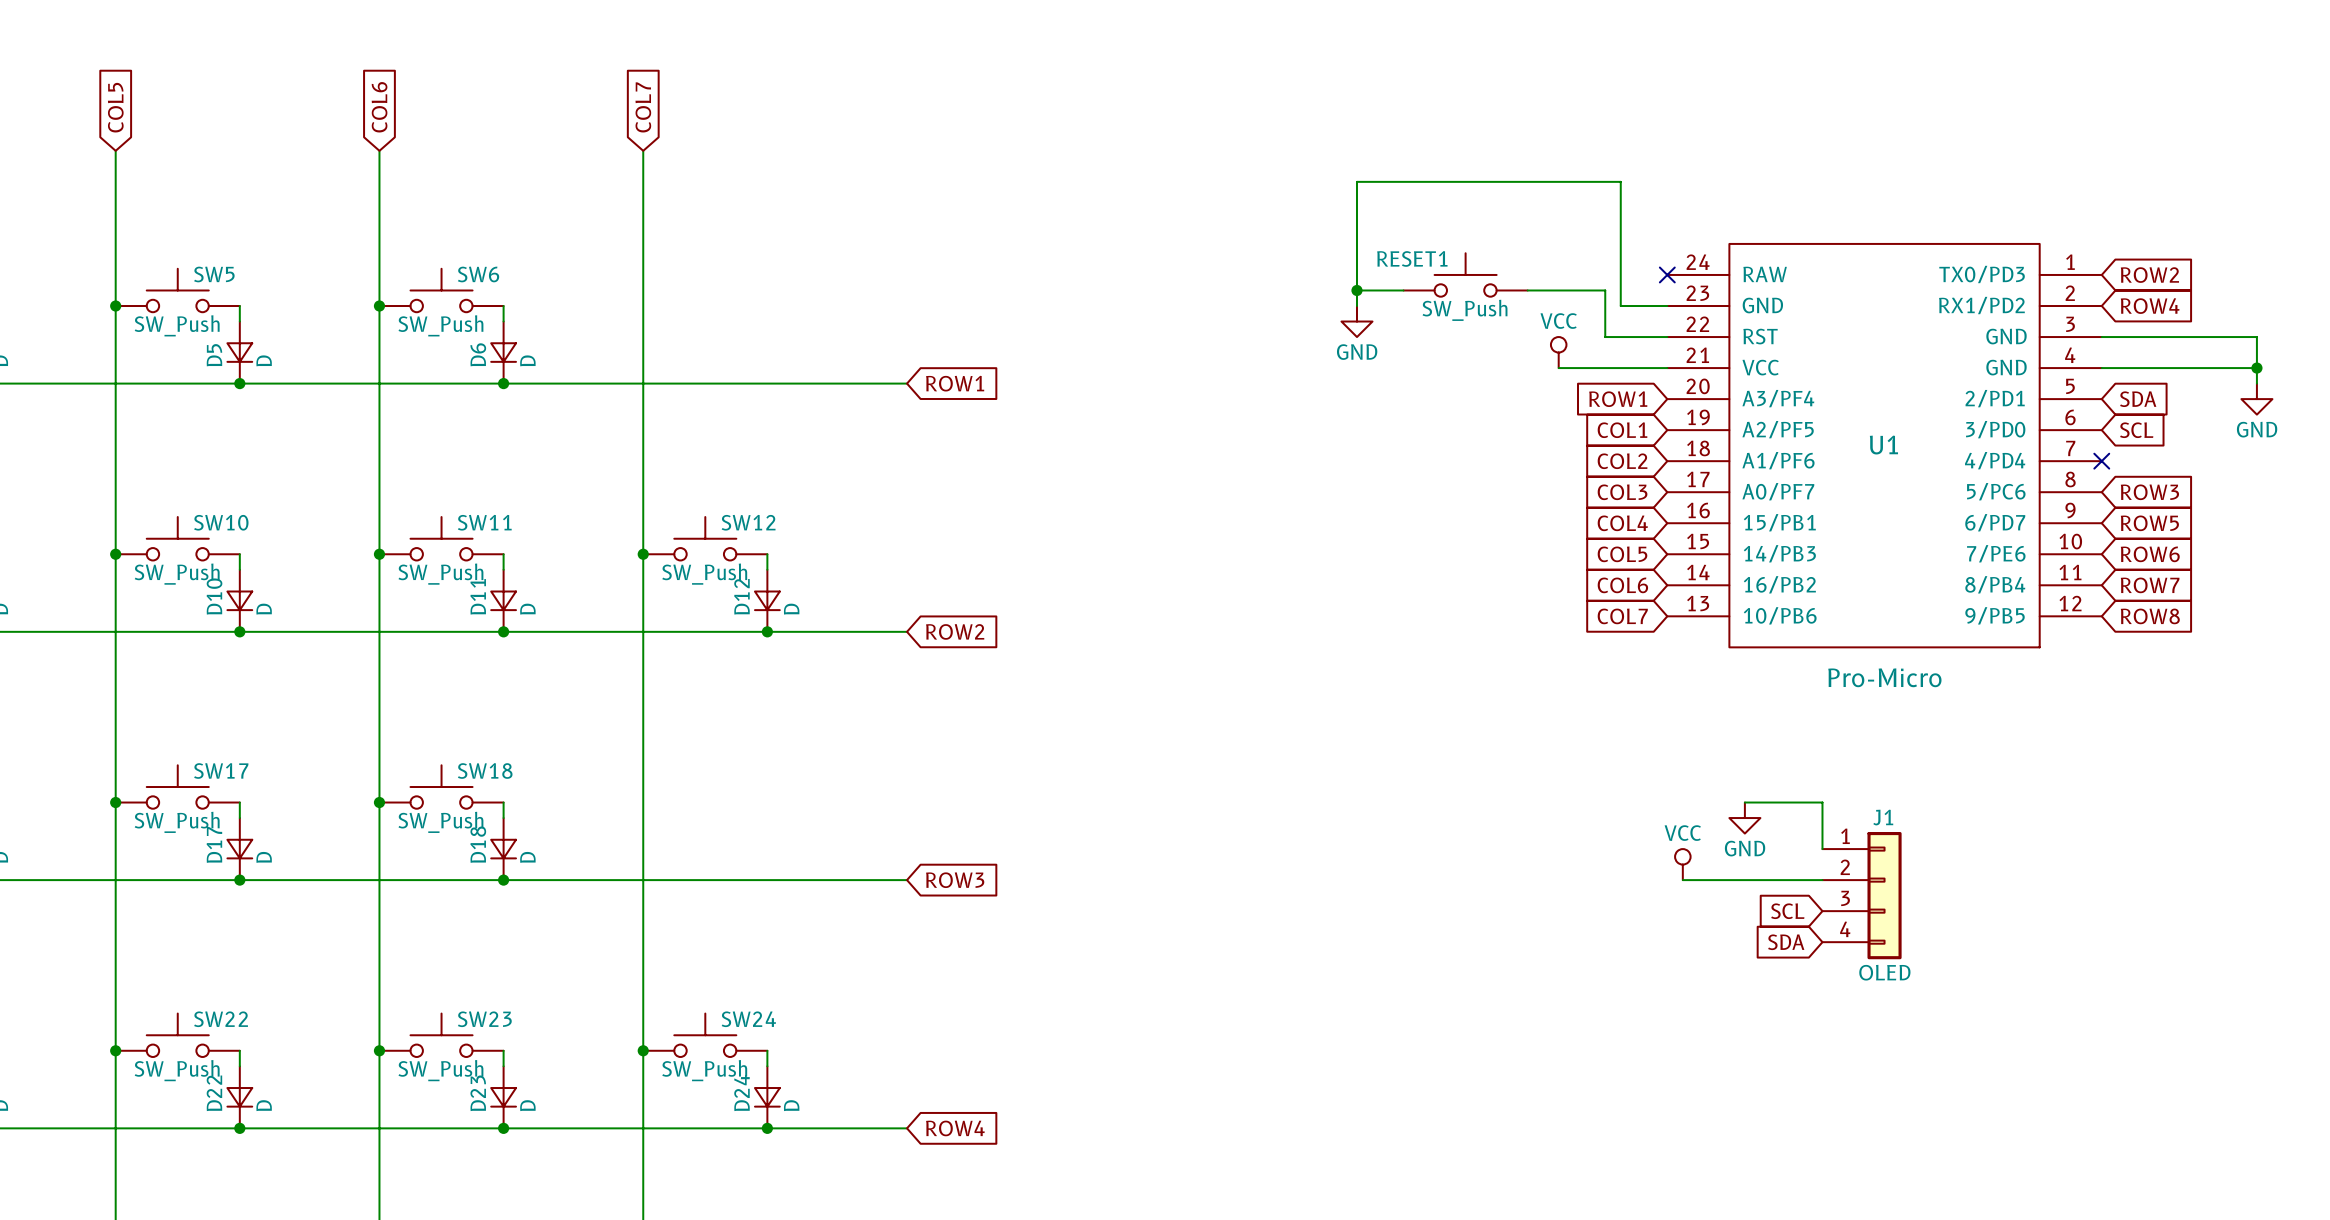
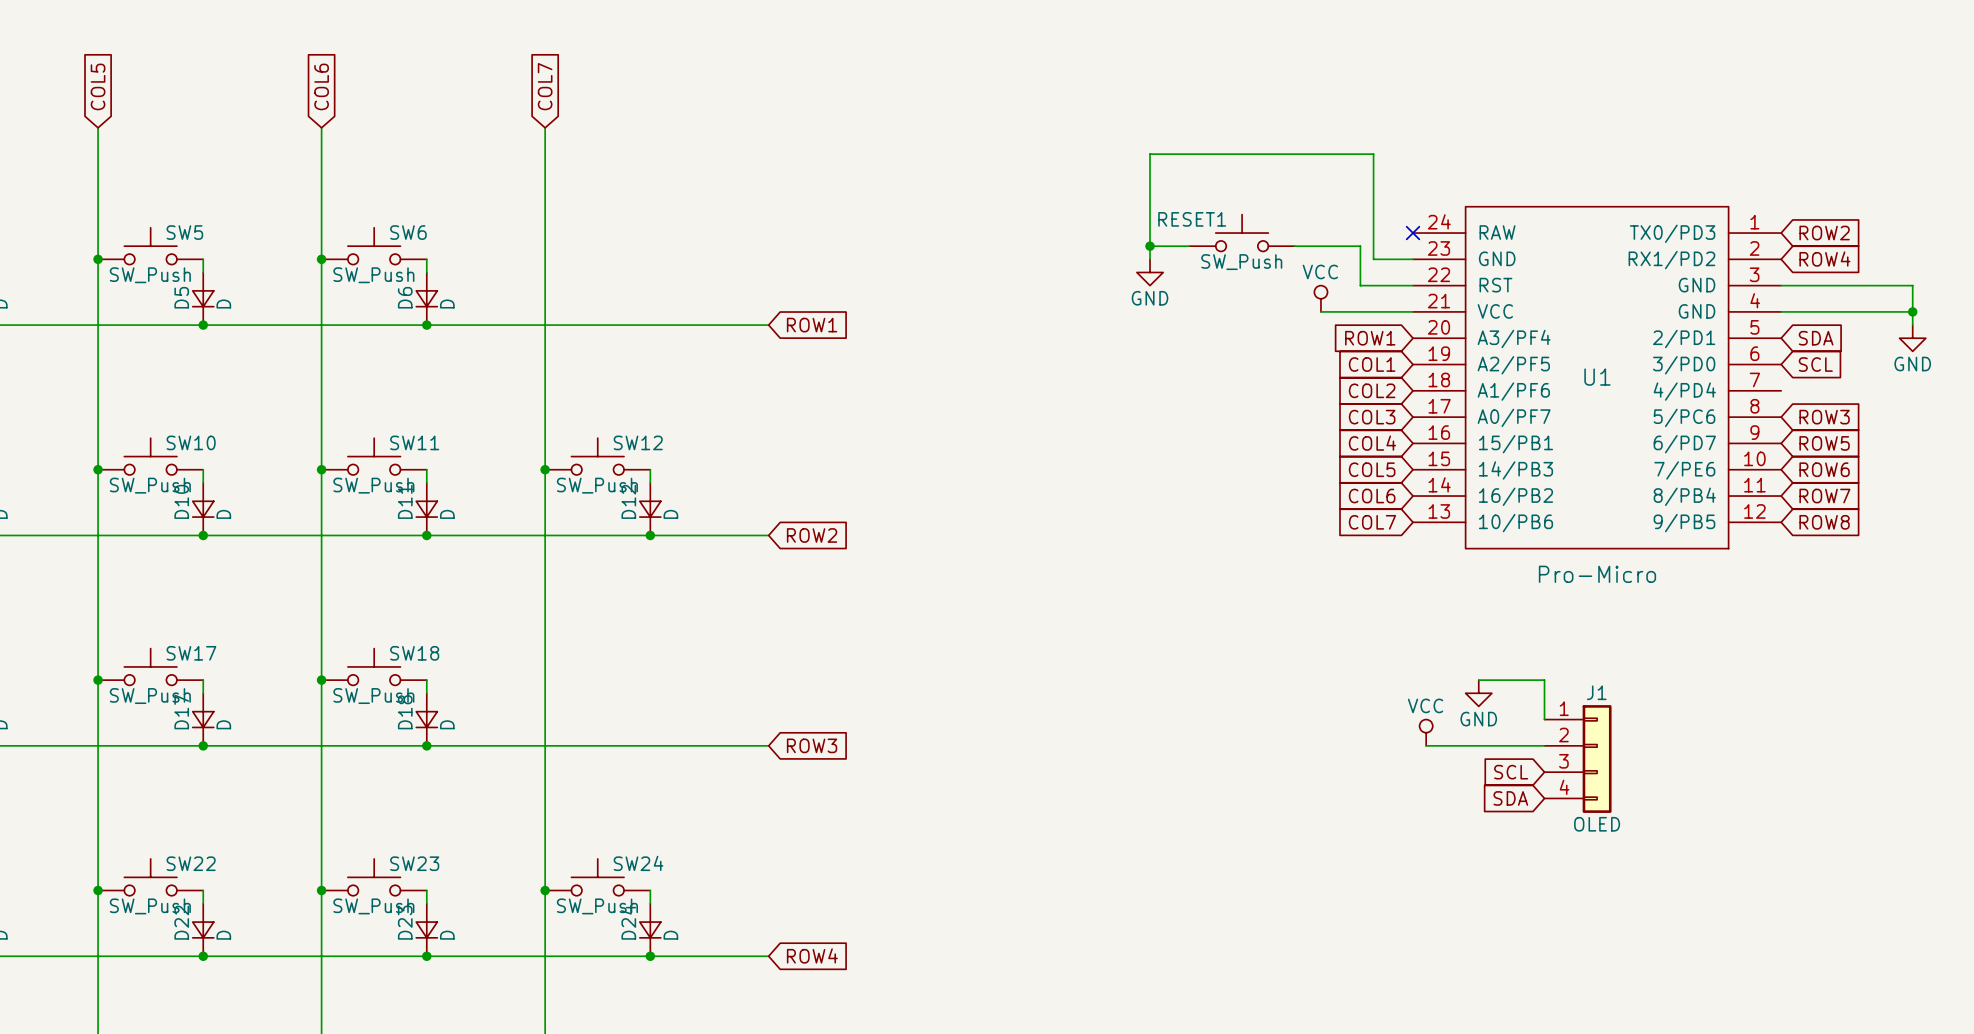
no-connect mark: (2101, 461) -> none

